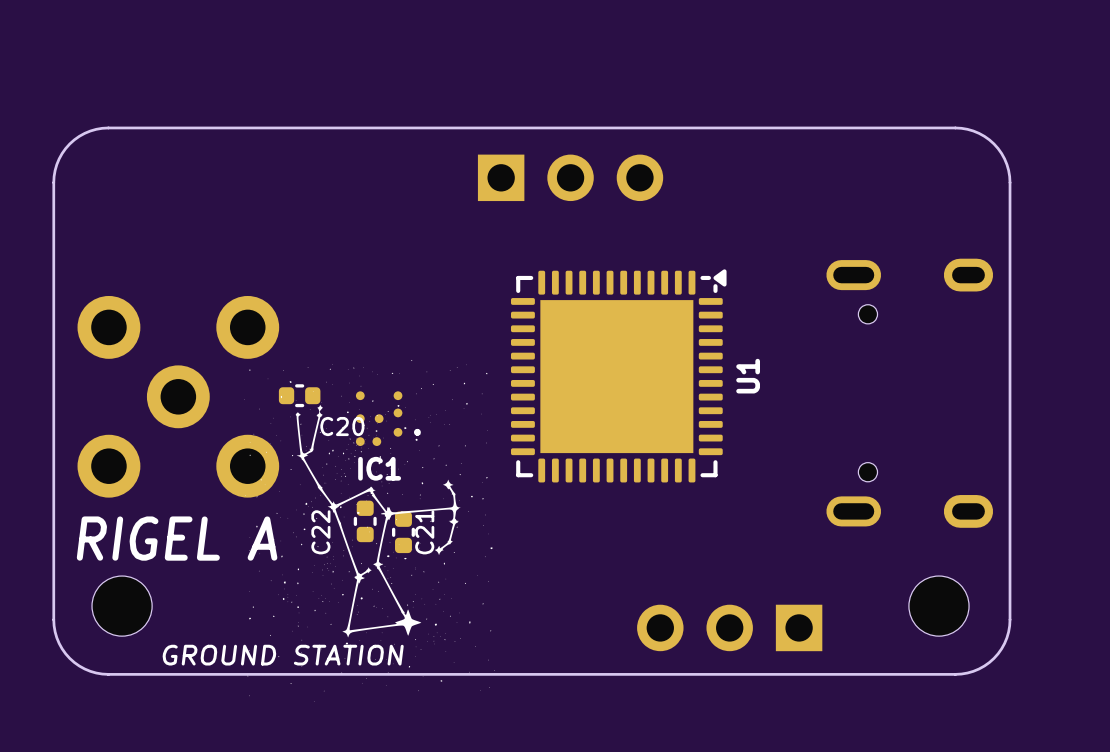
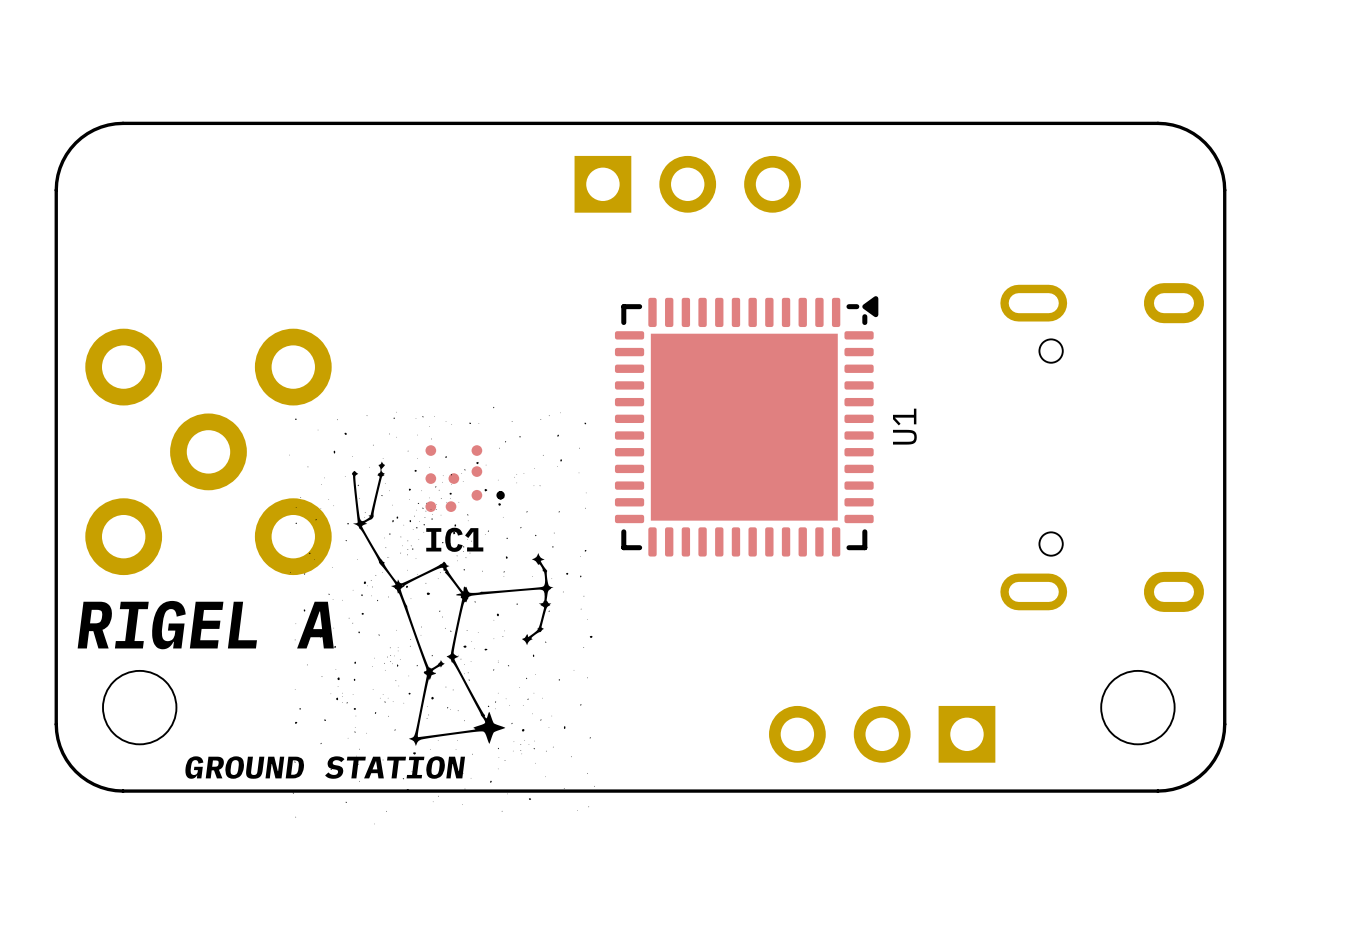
C20: (299, 395) -> none
C22: (365, 521) -> none
C21: (403, 532) -> none

